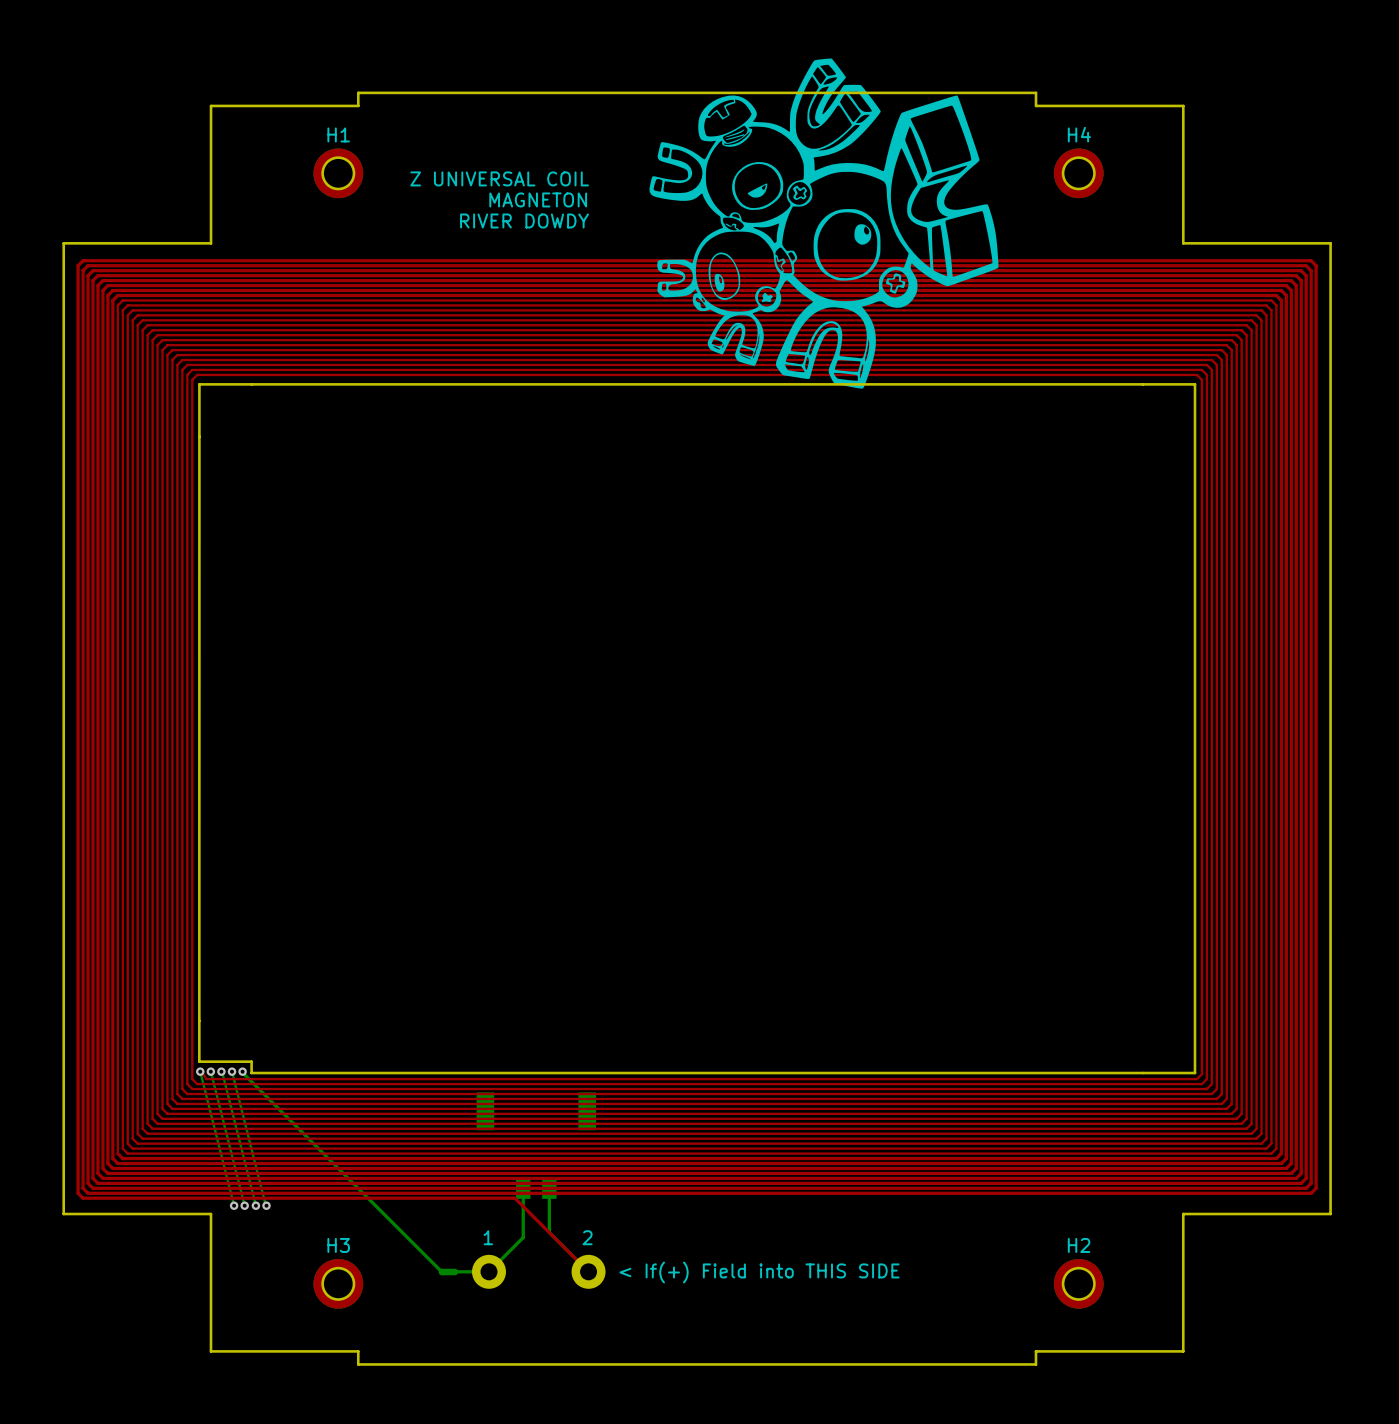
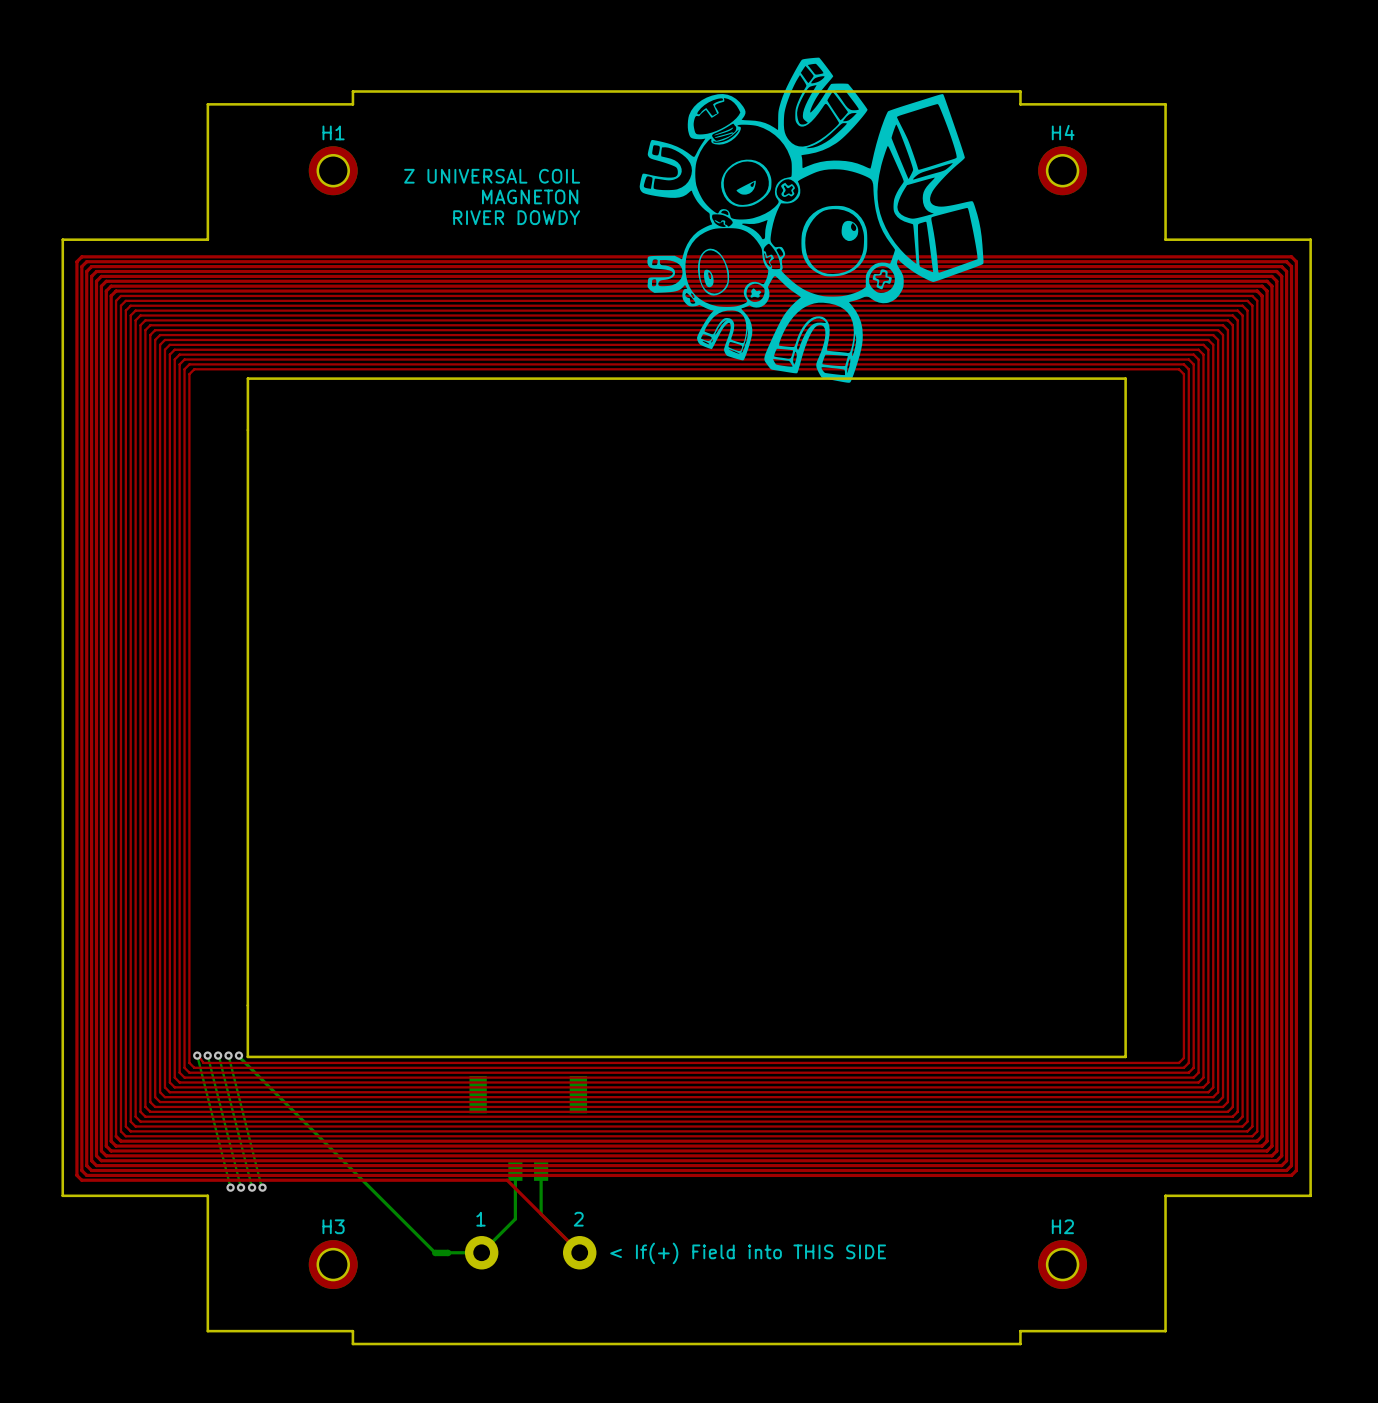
board edge: (251, 384) (199, 384) (199, 1020) (199, 1061) (251, 1061) -> (247, 378) (247, 1045)
board edge: (1142, 384) (1195, 384) (1195, 1073) (1142, 1073) -> (1125, 378) (1125, 1056)

